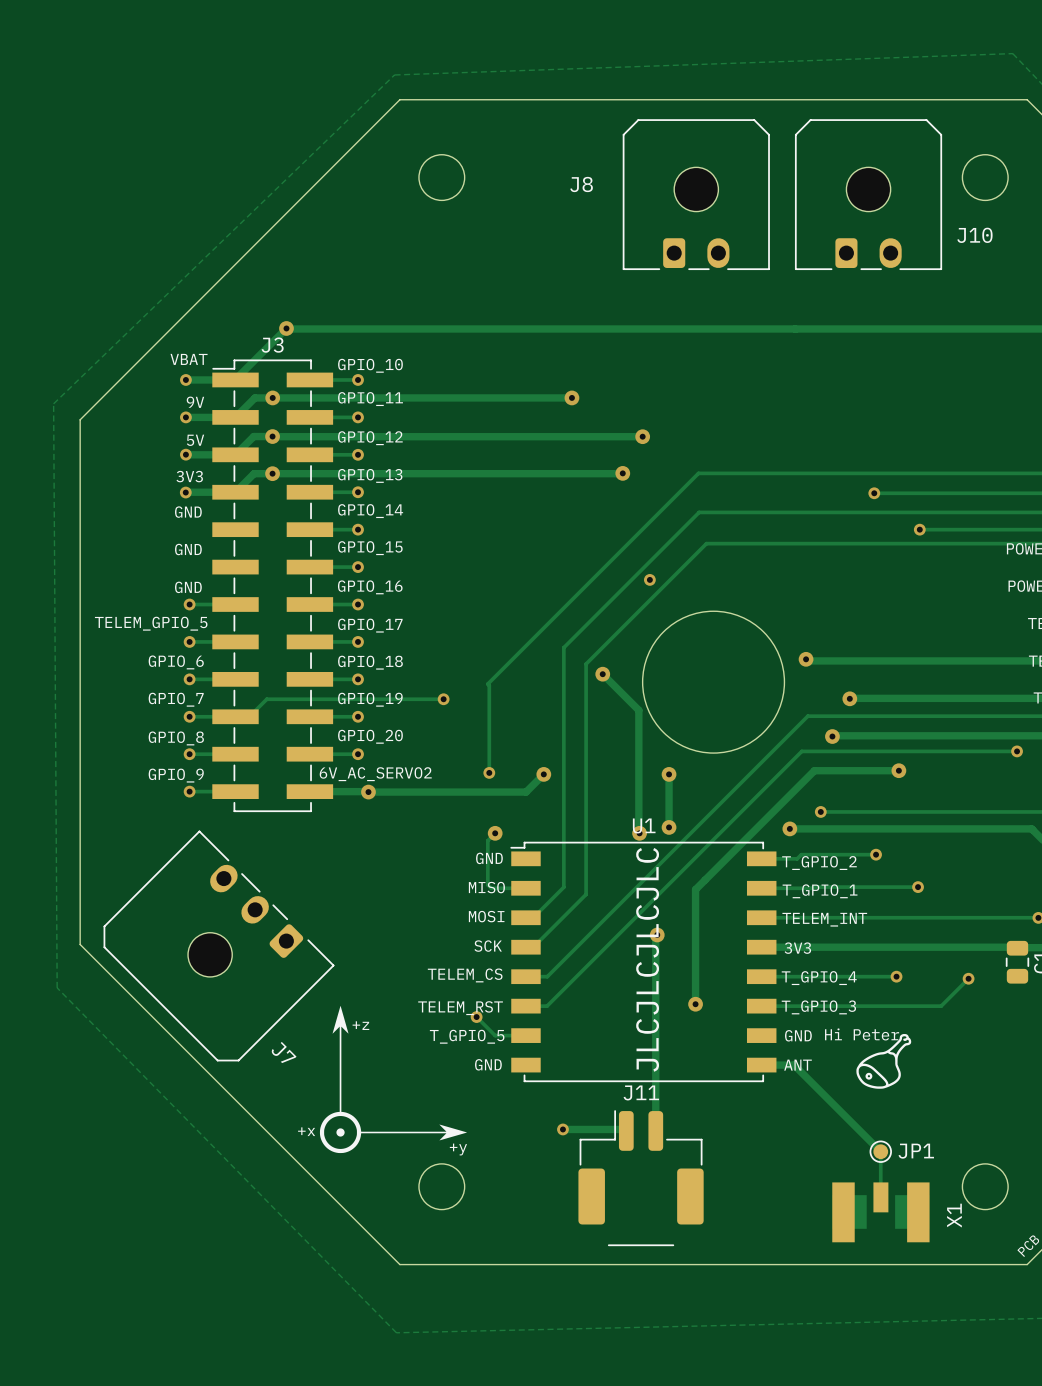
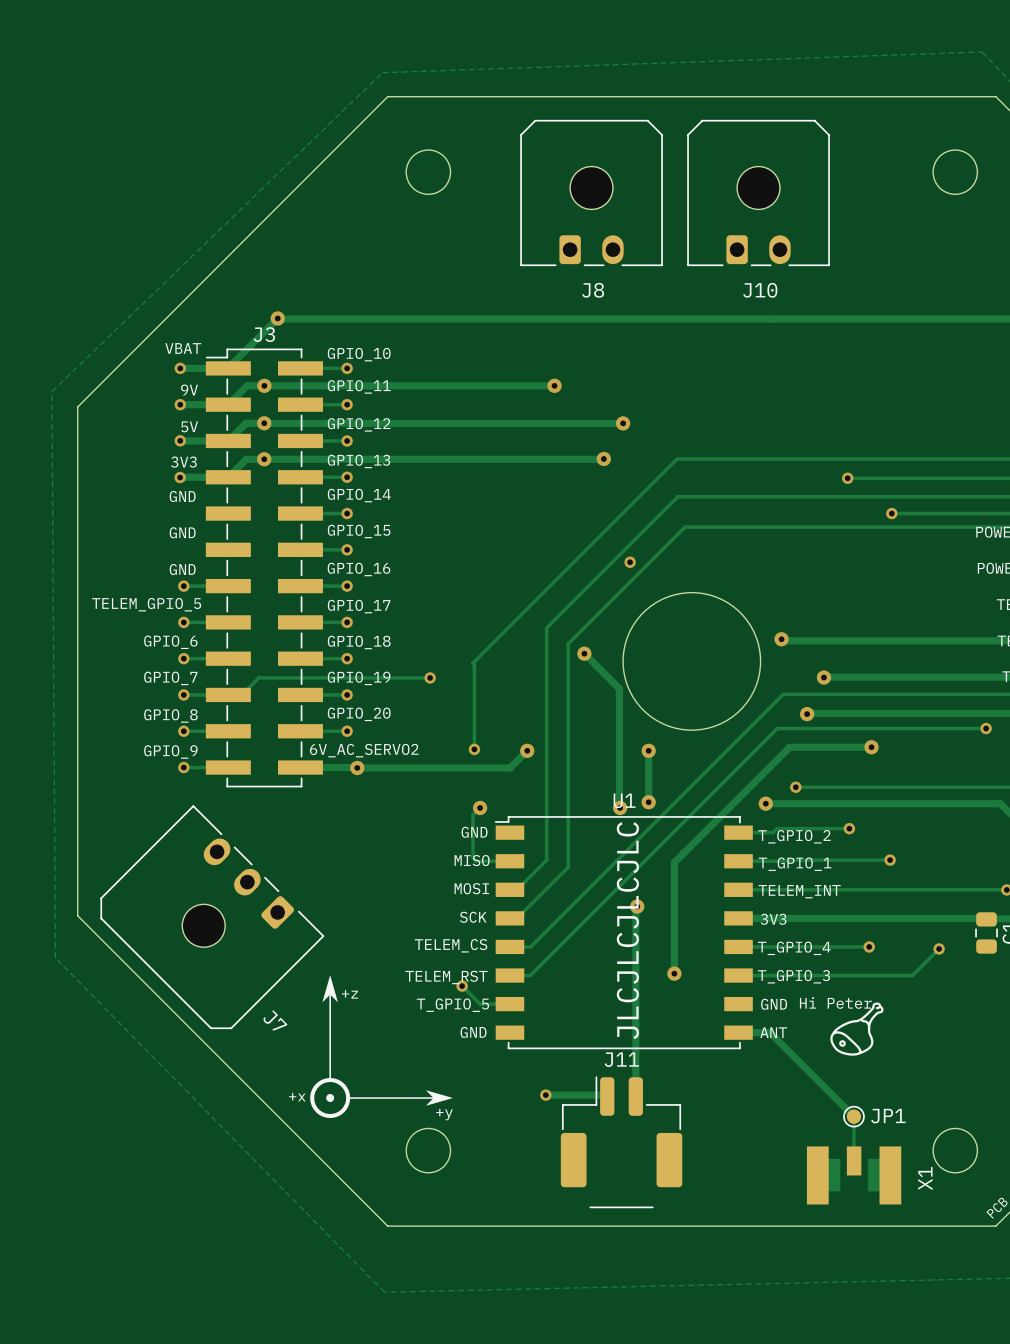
J8 name position: J8 (581, 184) -> J8 (593, 290)
J8 position: (696, 194) -> (591, 192)
J10 position: (868, 194) -> (758, 192)
J10 name position: J10 (974, 235) -> J10 (760, 290)

